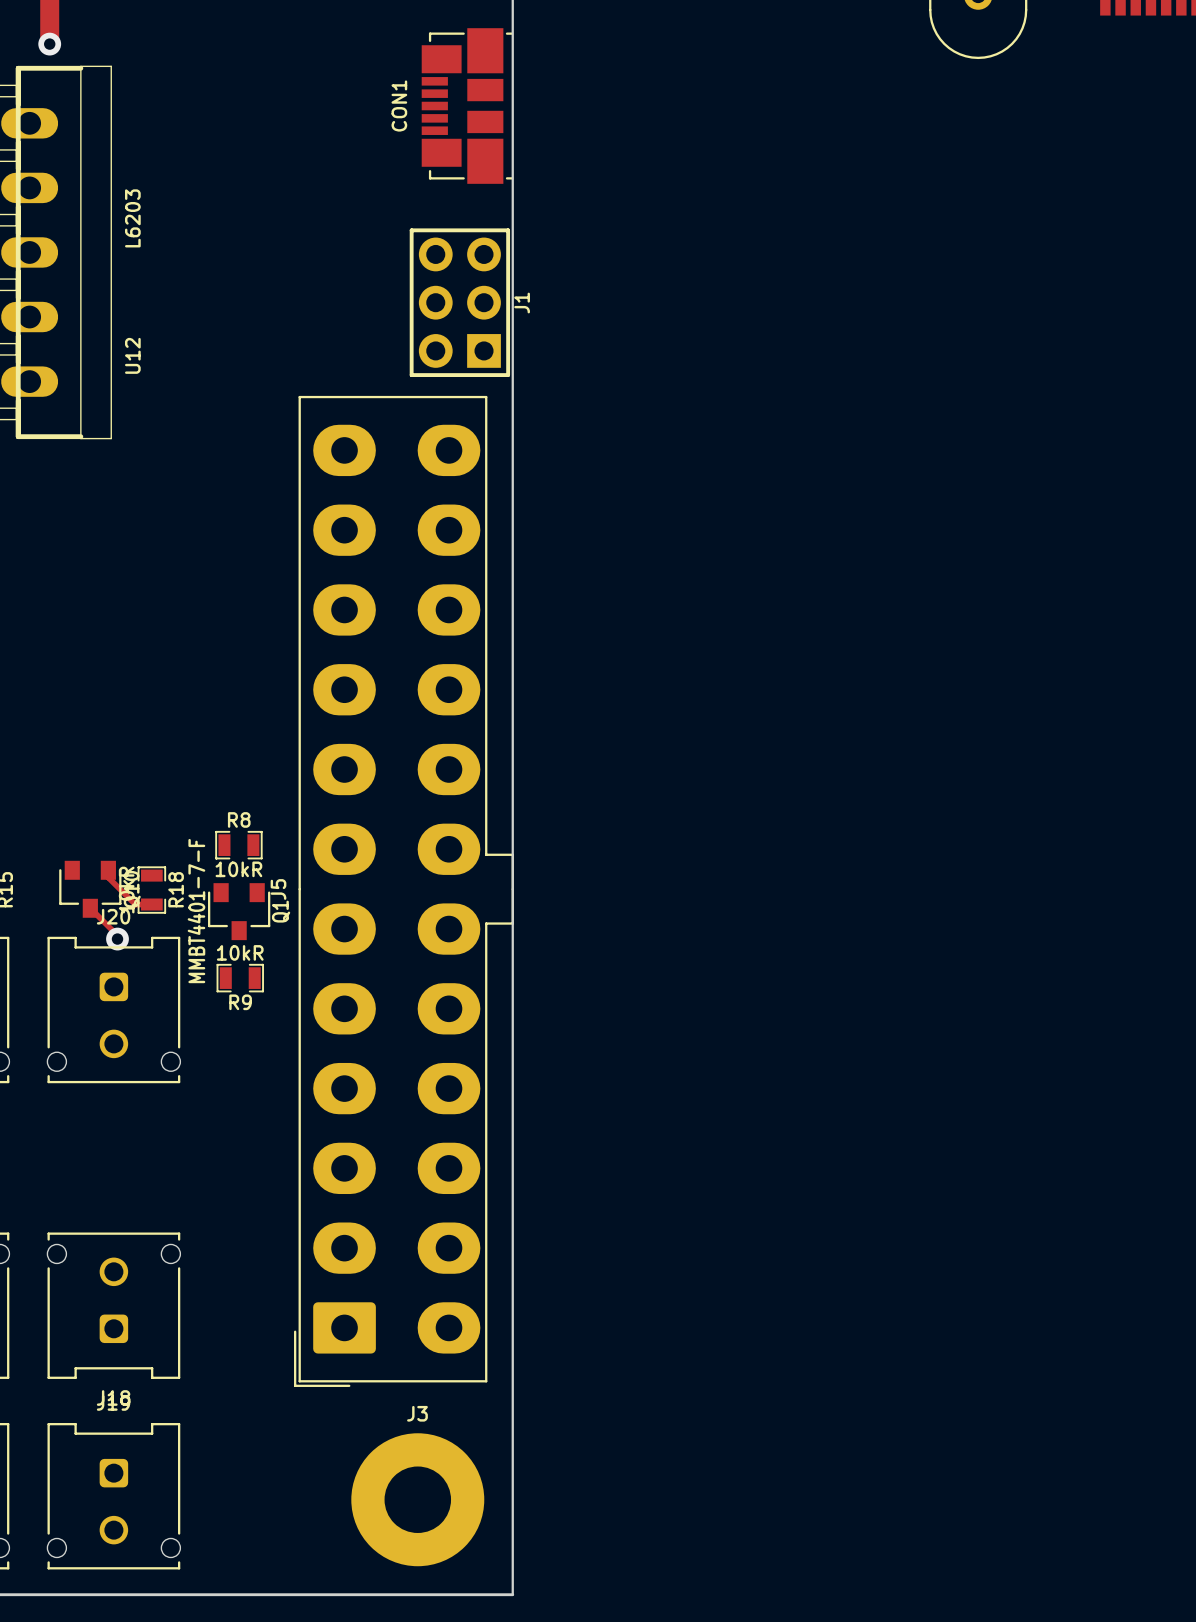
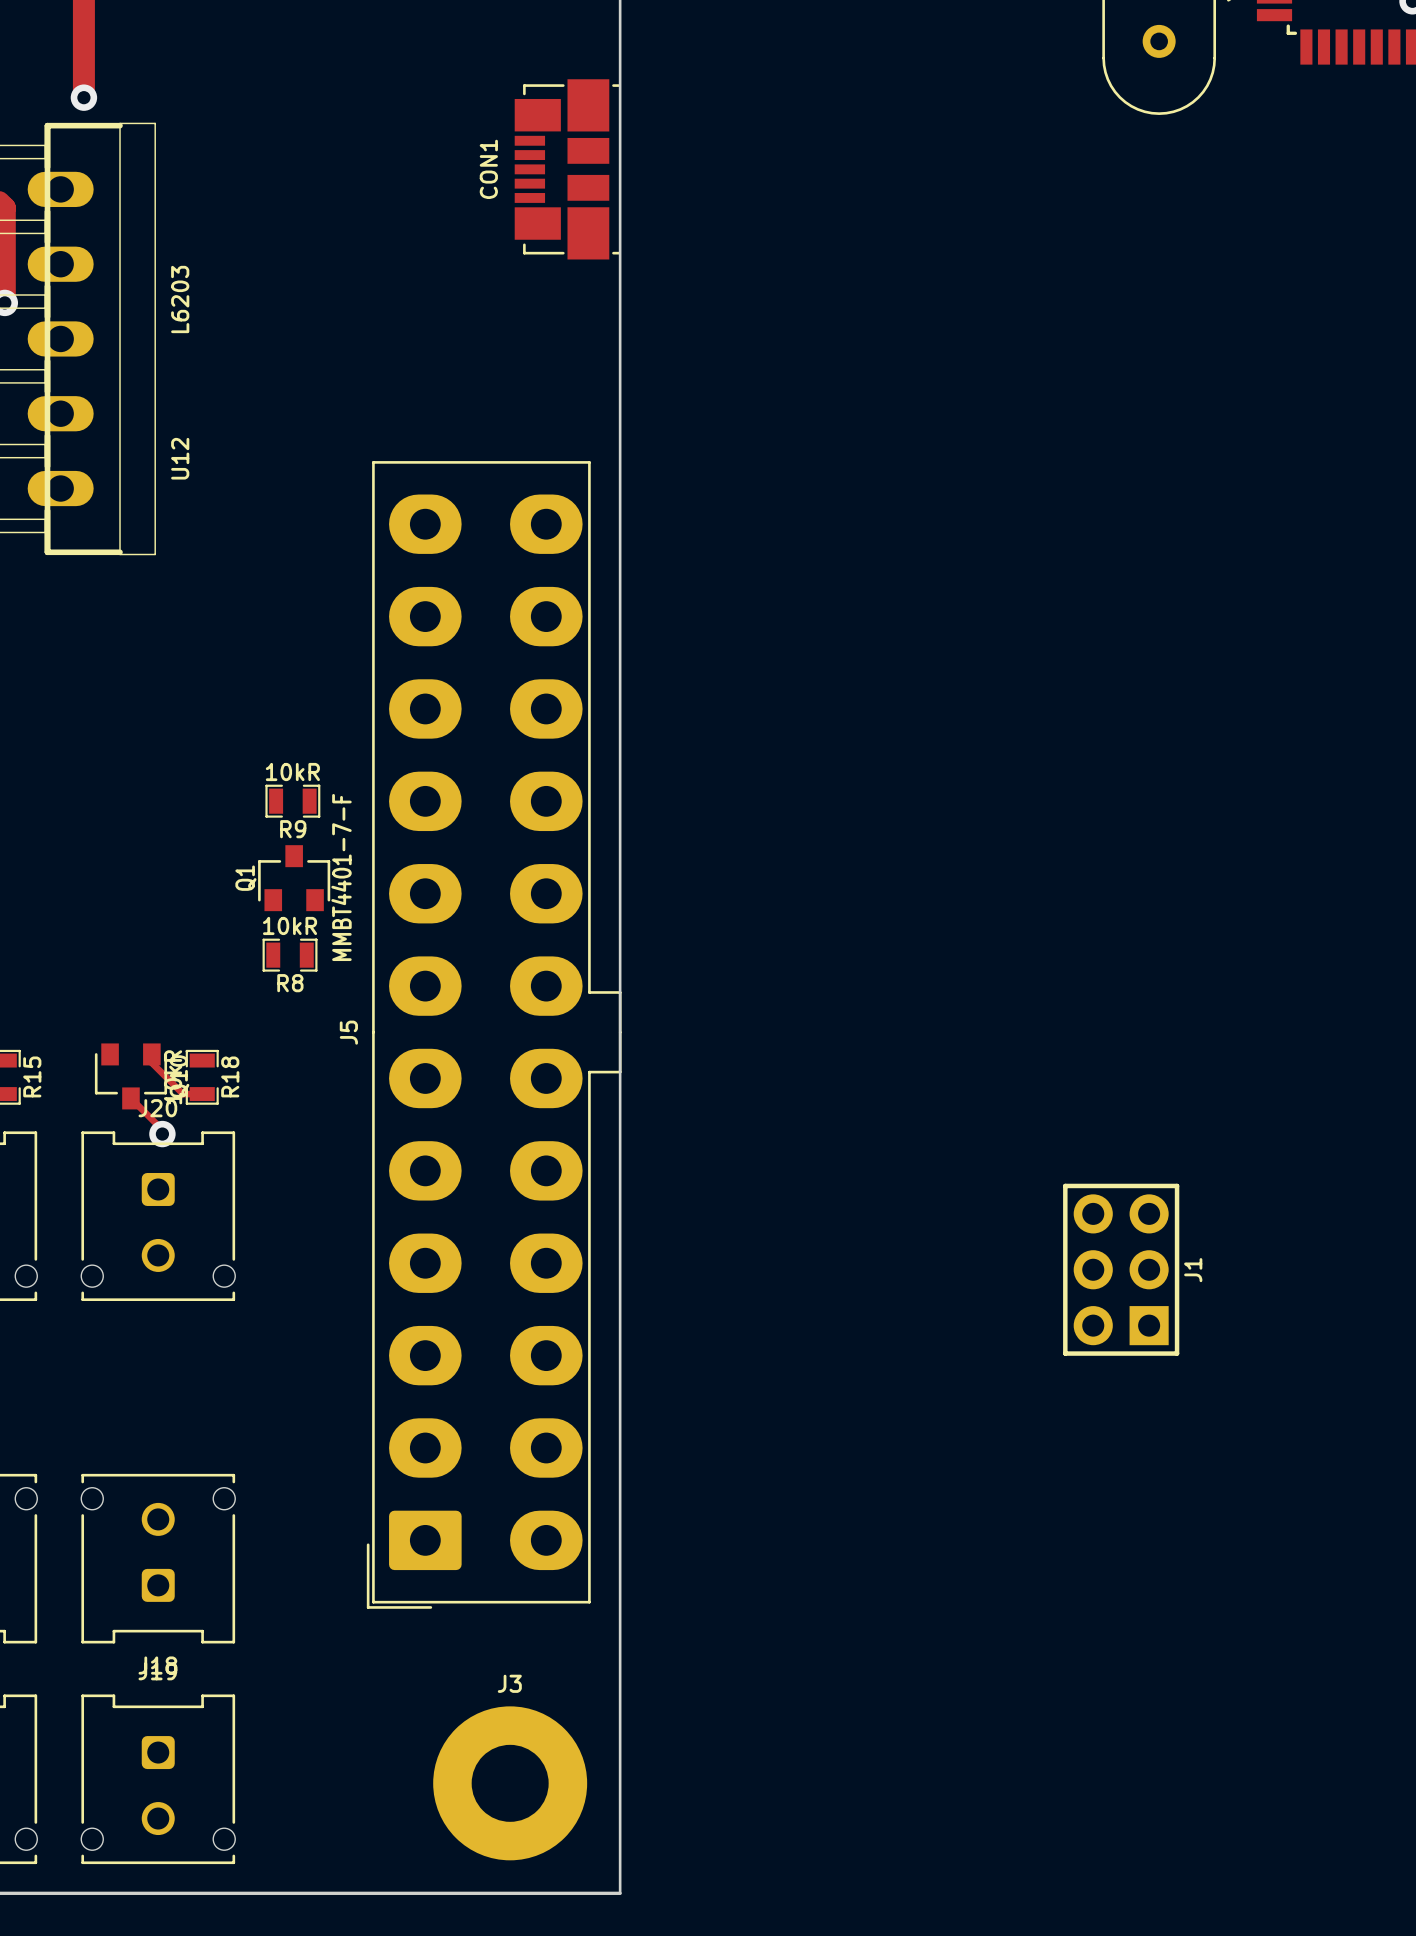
J1 position: (459, 302) -> (1121, 1269)
R8 rotation: 0° (238, 845) -> 180° (290, 955)
R8 position: (238, 845) -> (290, 955)
J5 position: (403, 891) -> (494, 1034)
Q1 rotation: 0° (239, 911) -> 180° (294, 878)
Q1 position: (239, 911) -> (294, 878)
R9 position: (240, 978) -> (292, 801)

